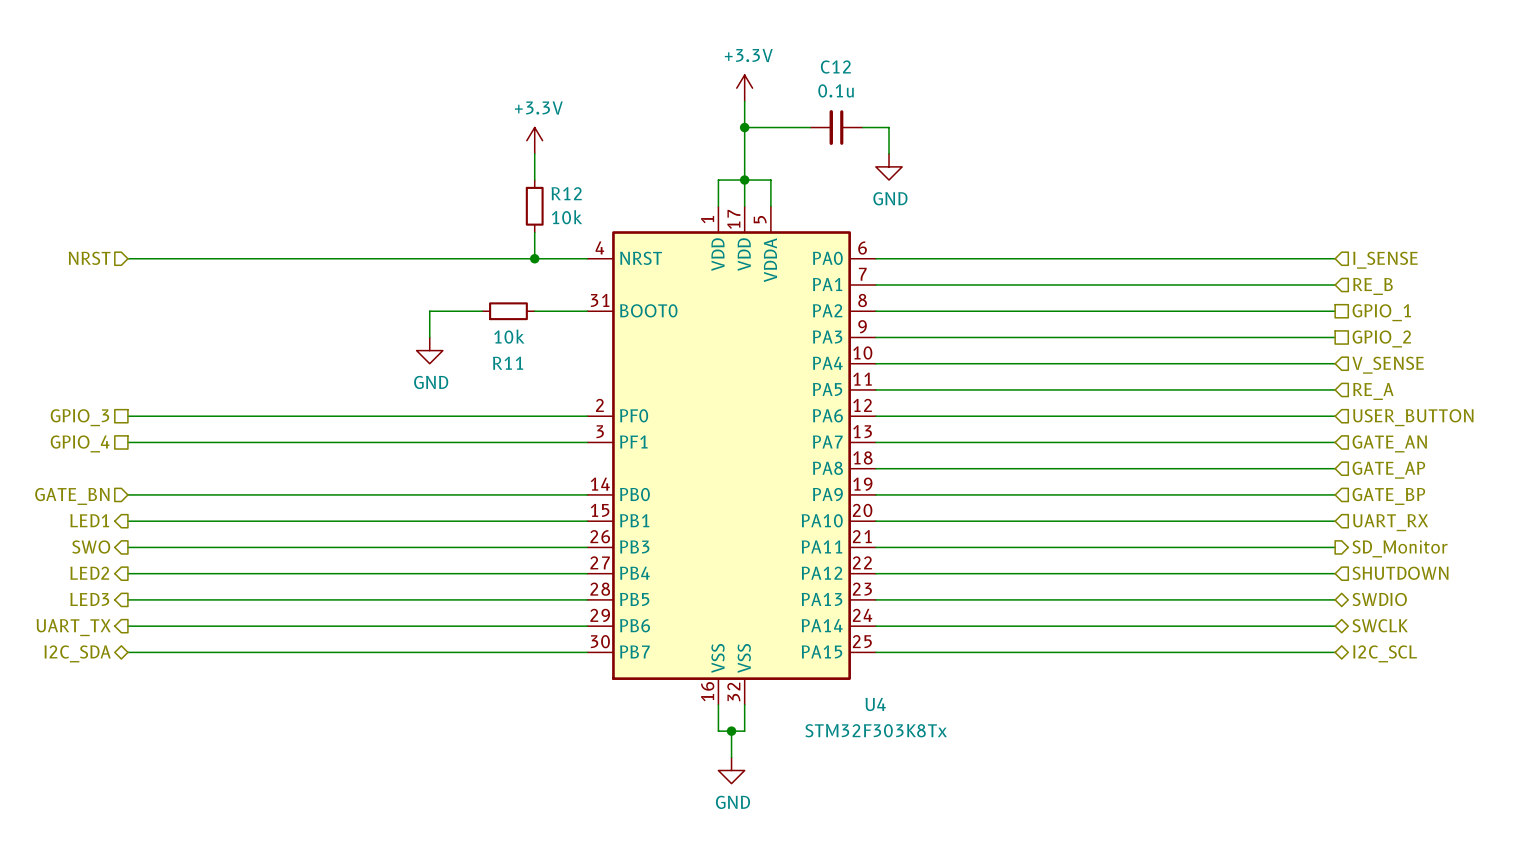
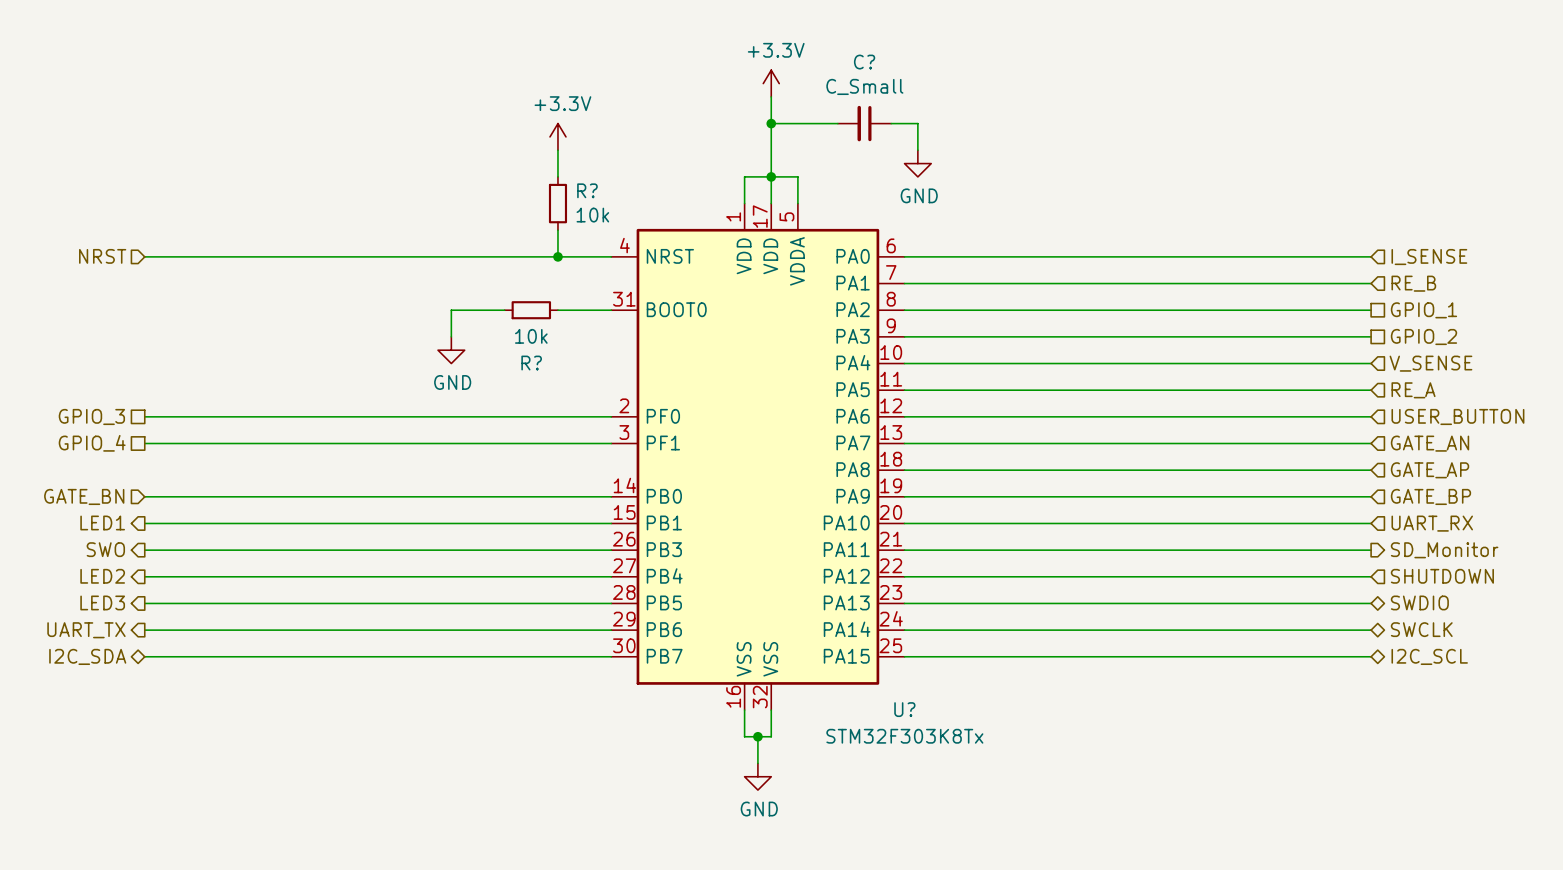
C12 name: C12 (835, 67) -> C? (864, 62)
C12 value: 0.1u (836, 90) -> C_Small (864, 86)
R12 name: R12 (566, 193) -> R? (587, 190)
R11 name: R11 (508, 363) -> R? (531, 363)
U4 name: U4 (875, 704) -> U? (904, 709)

